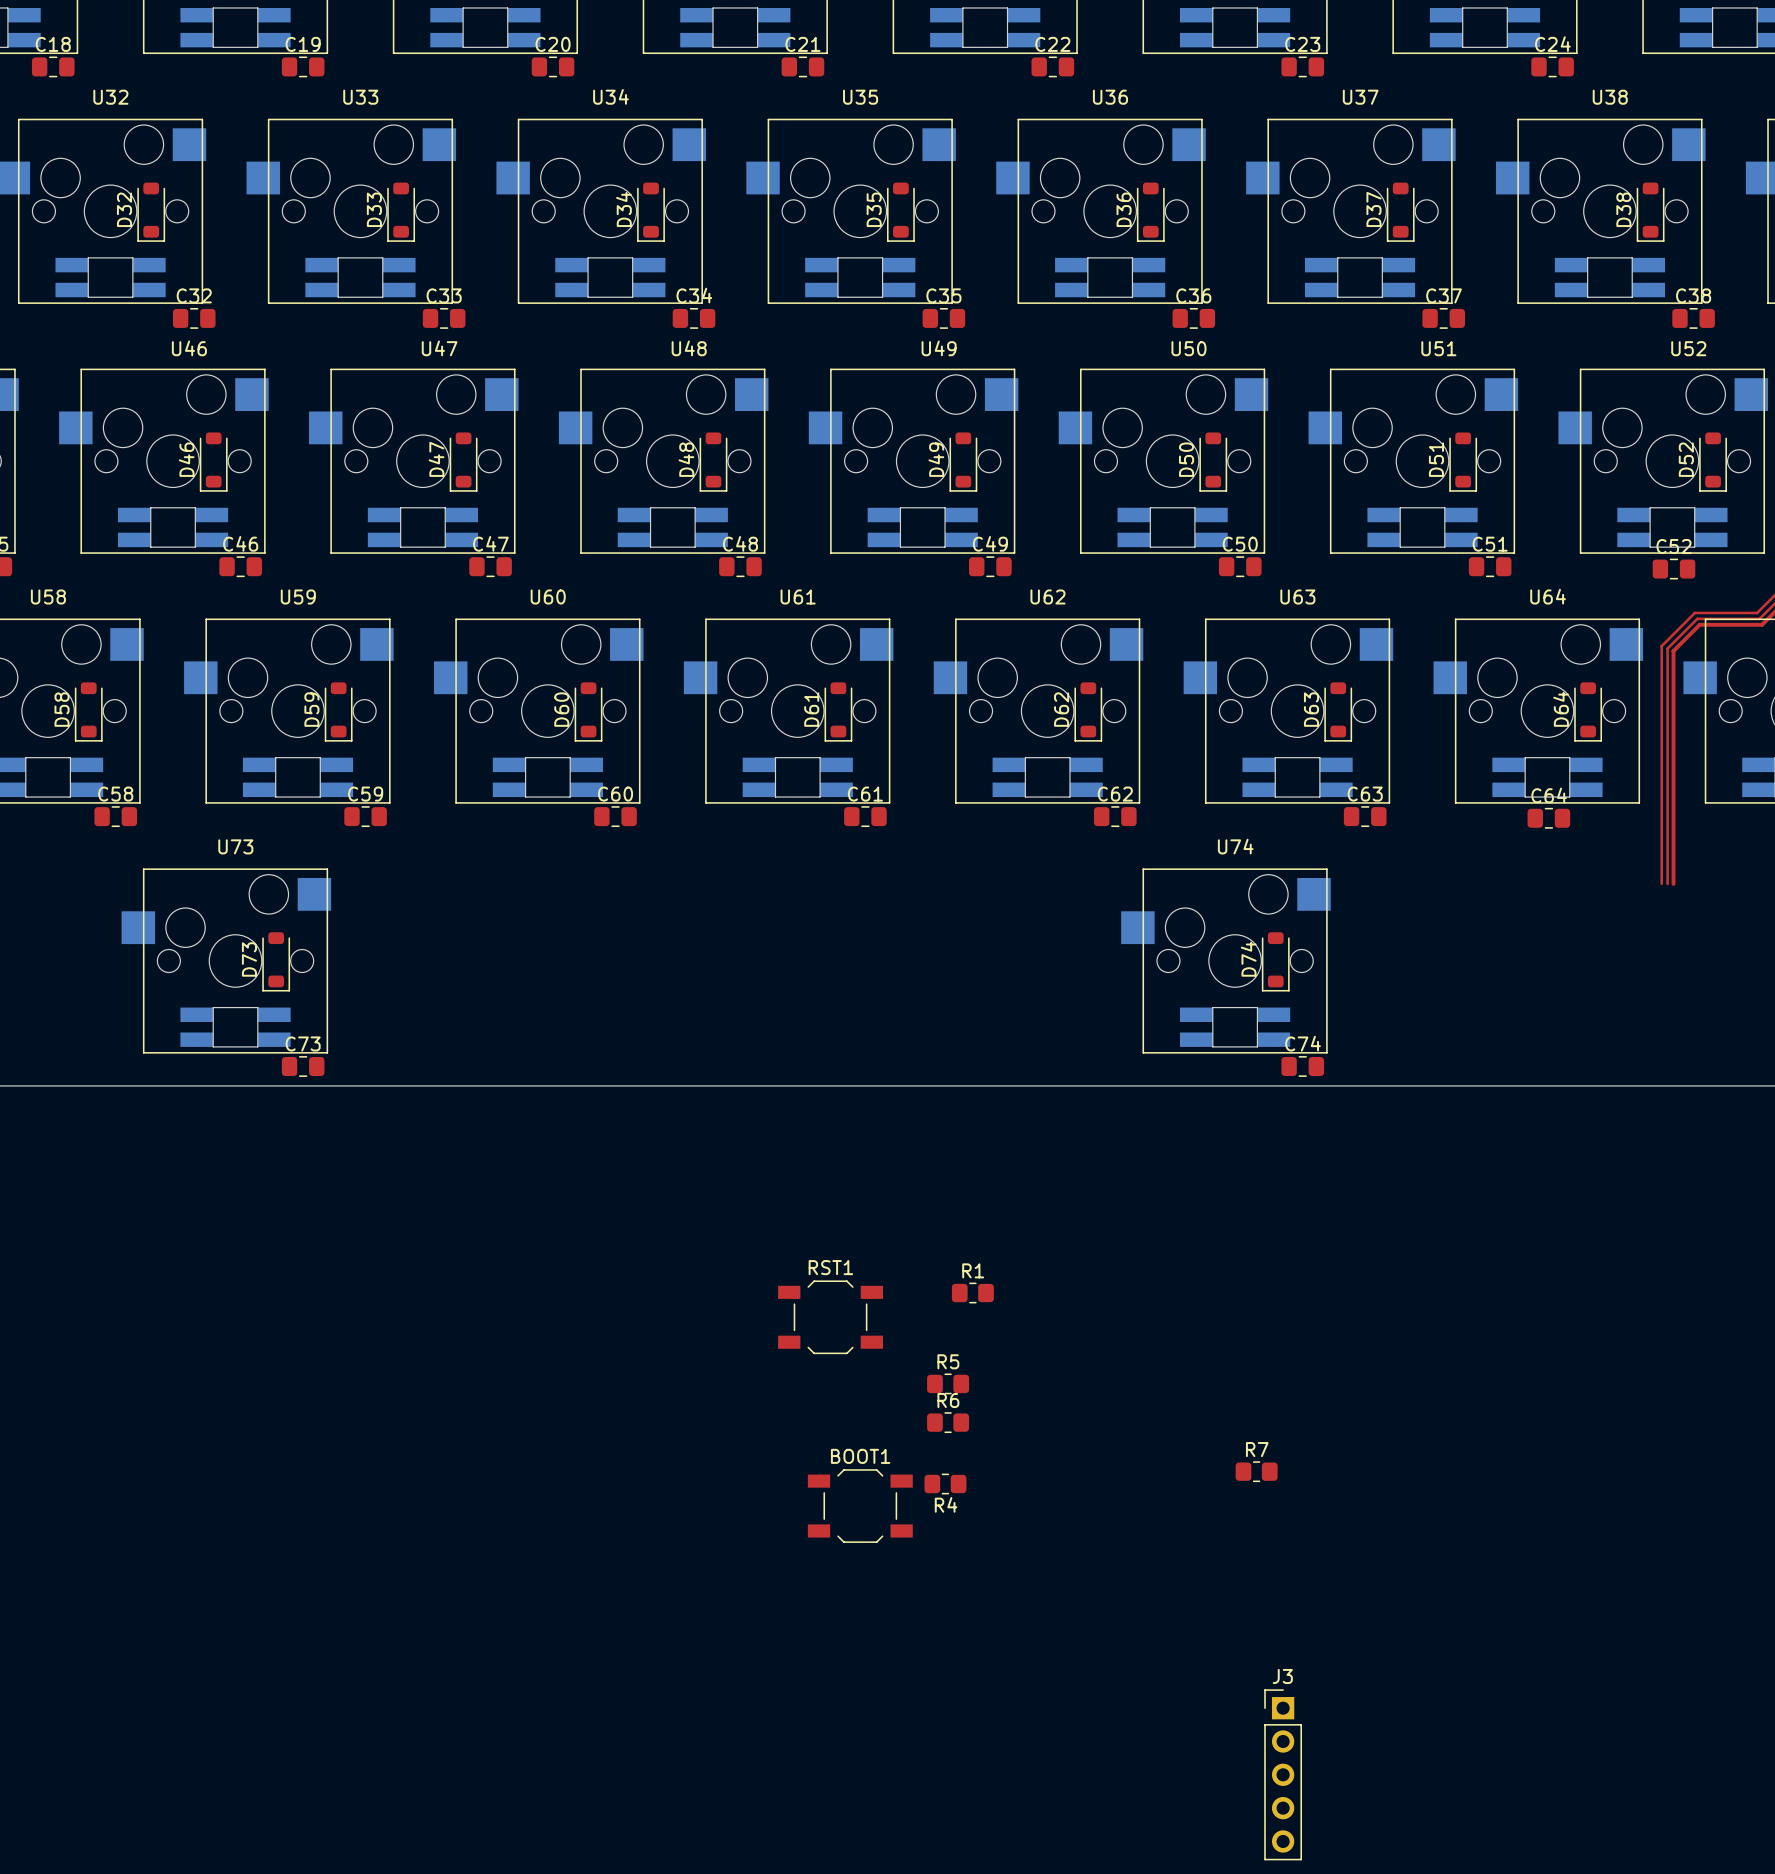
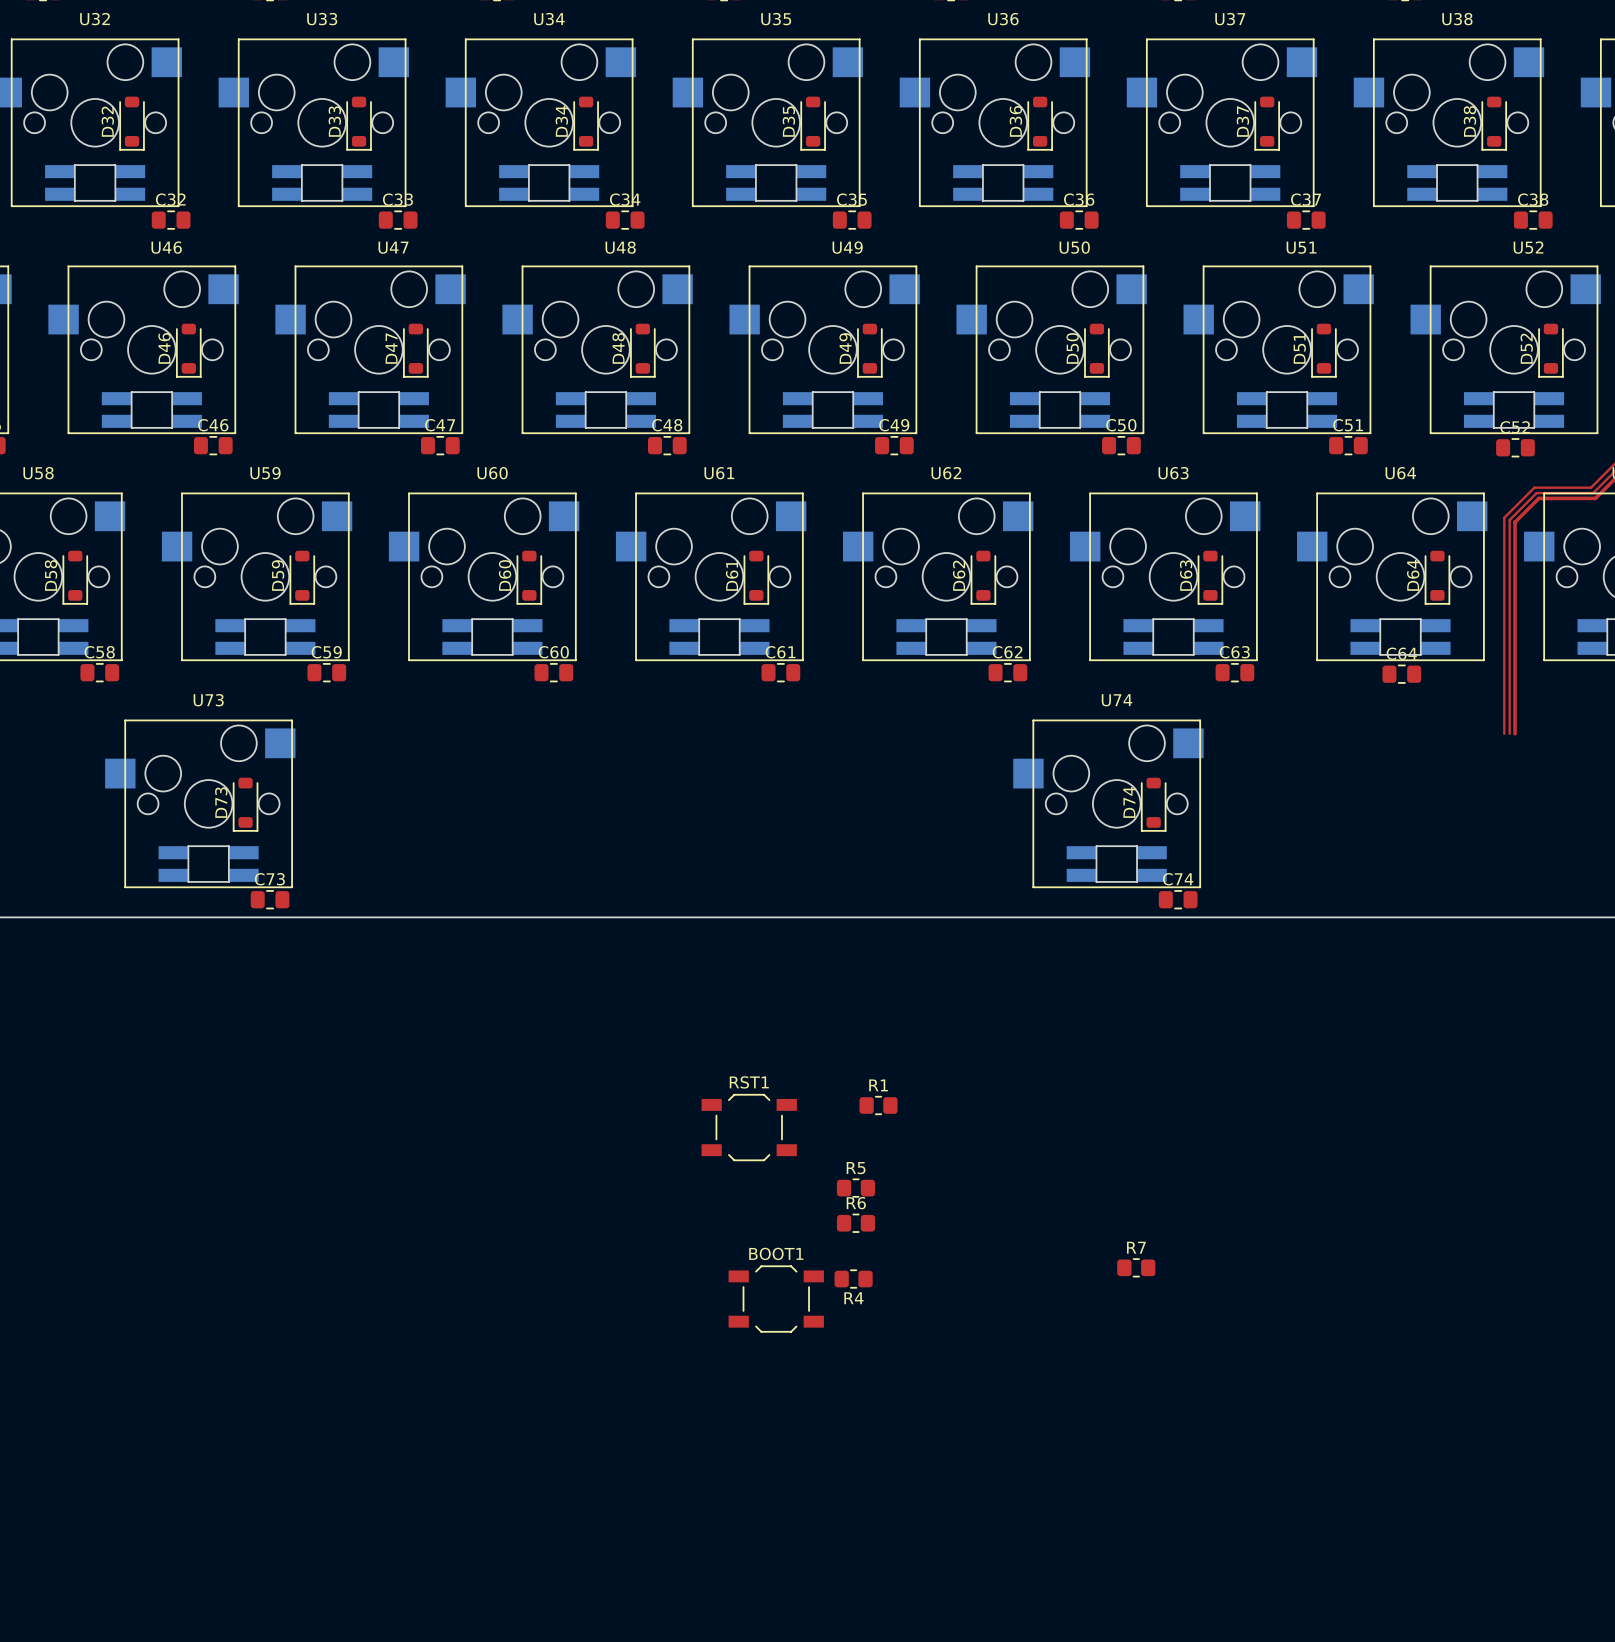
J3: (1283, 1774) -> none

